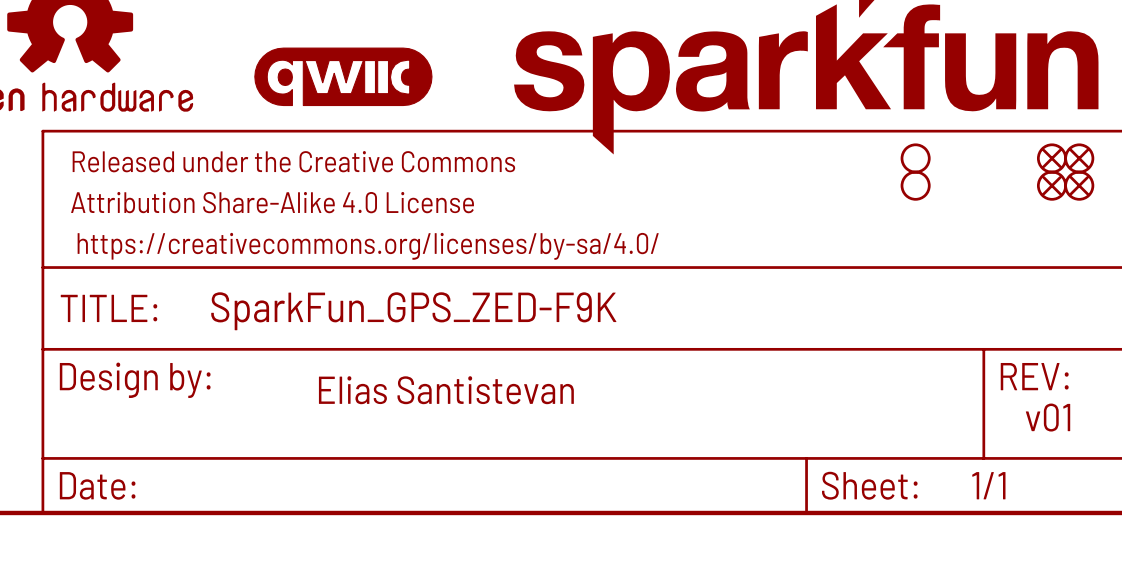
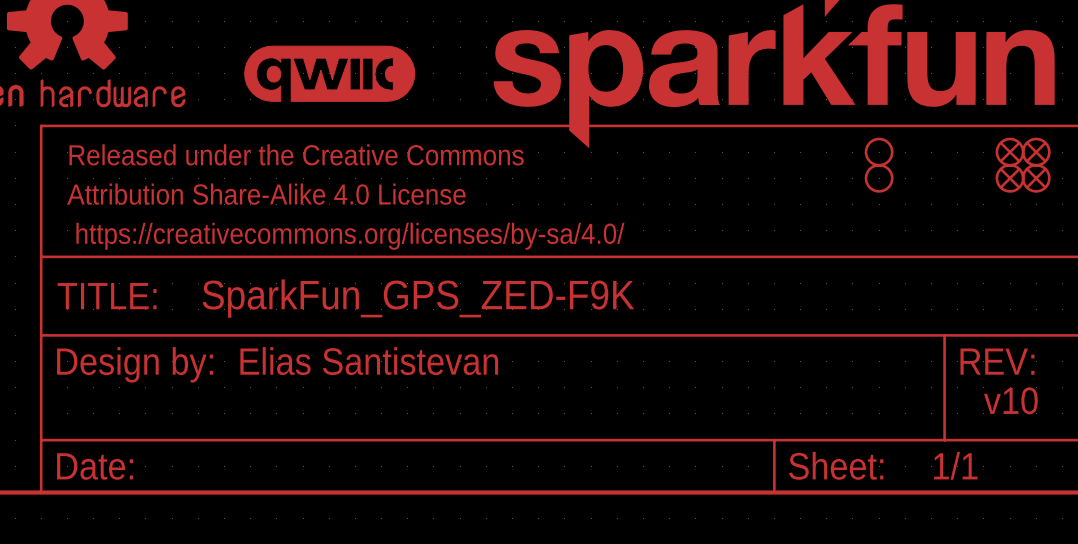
text position: Elias Santistevan (446, 390) -> Elias Santistevan (369, 361)
text: v01 (1048, 417) -> v10 (1010, 400)

